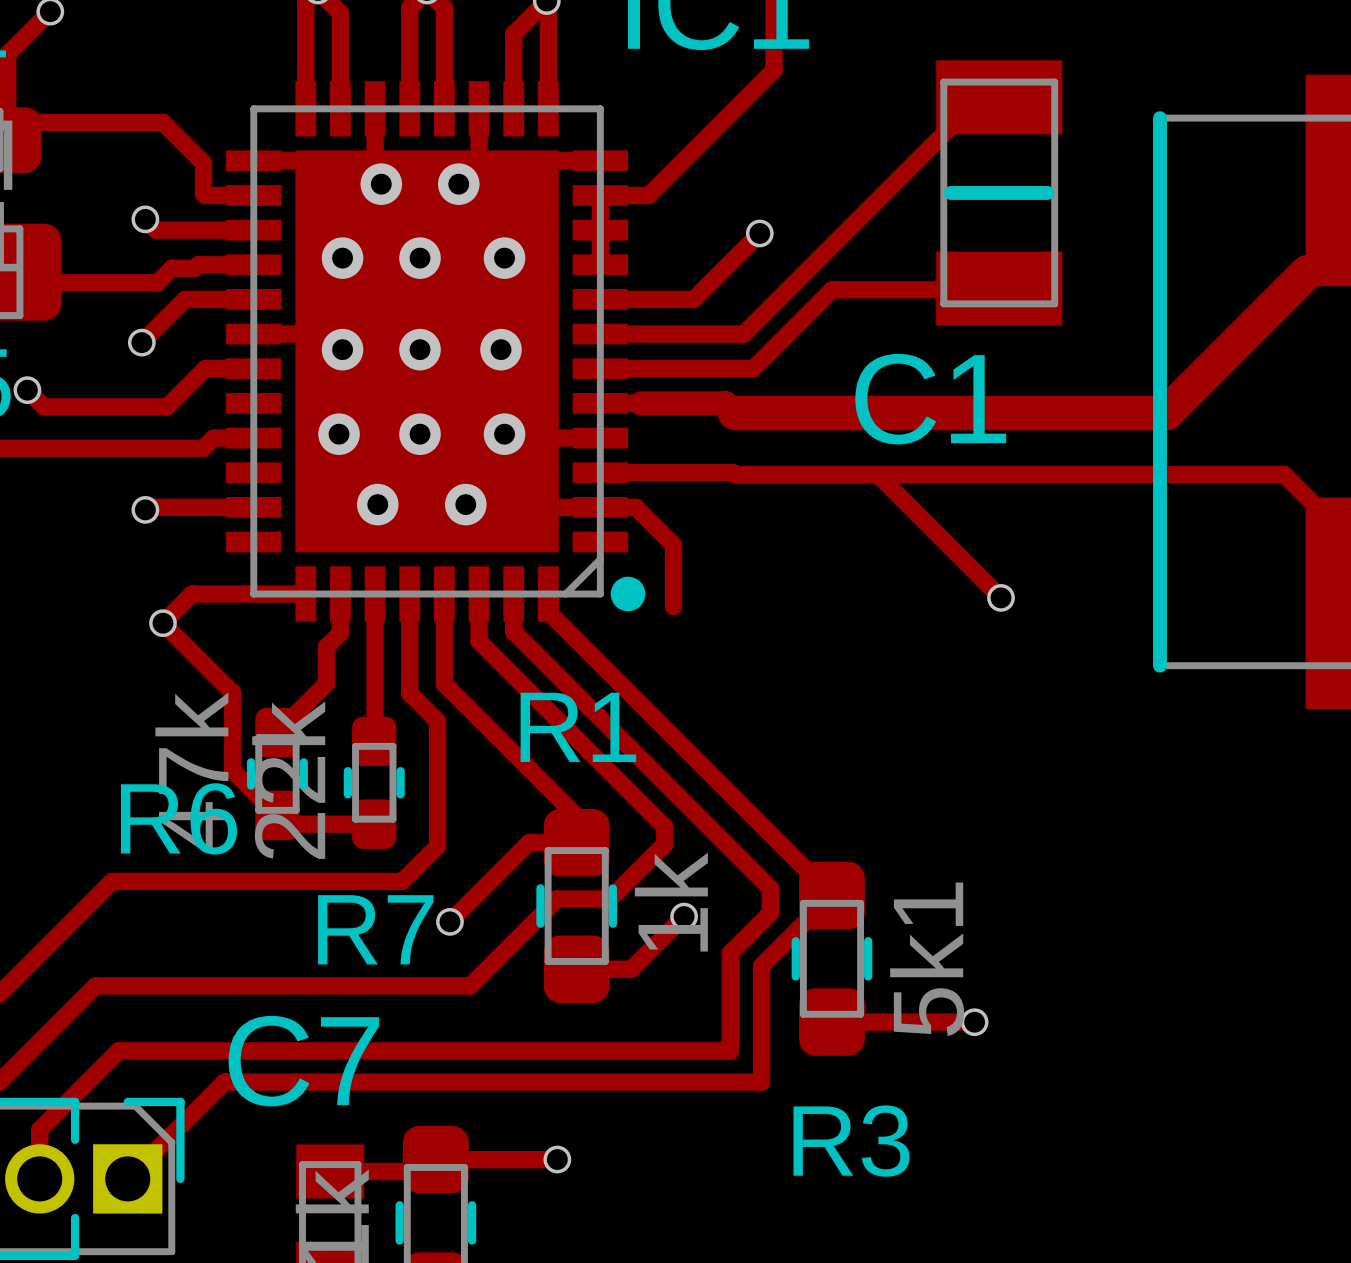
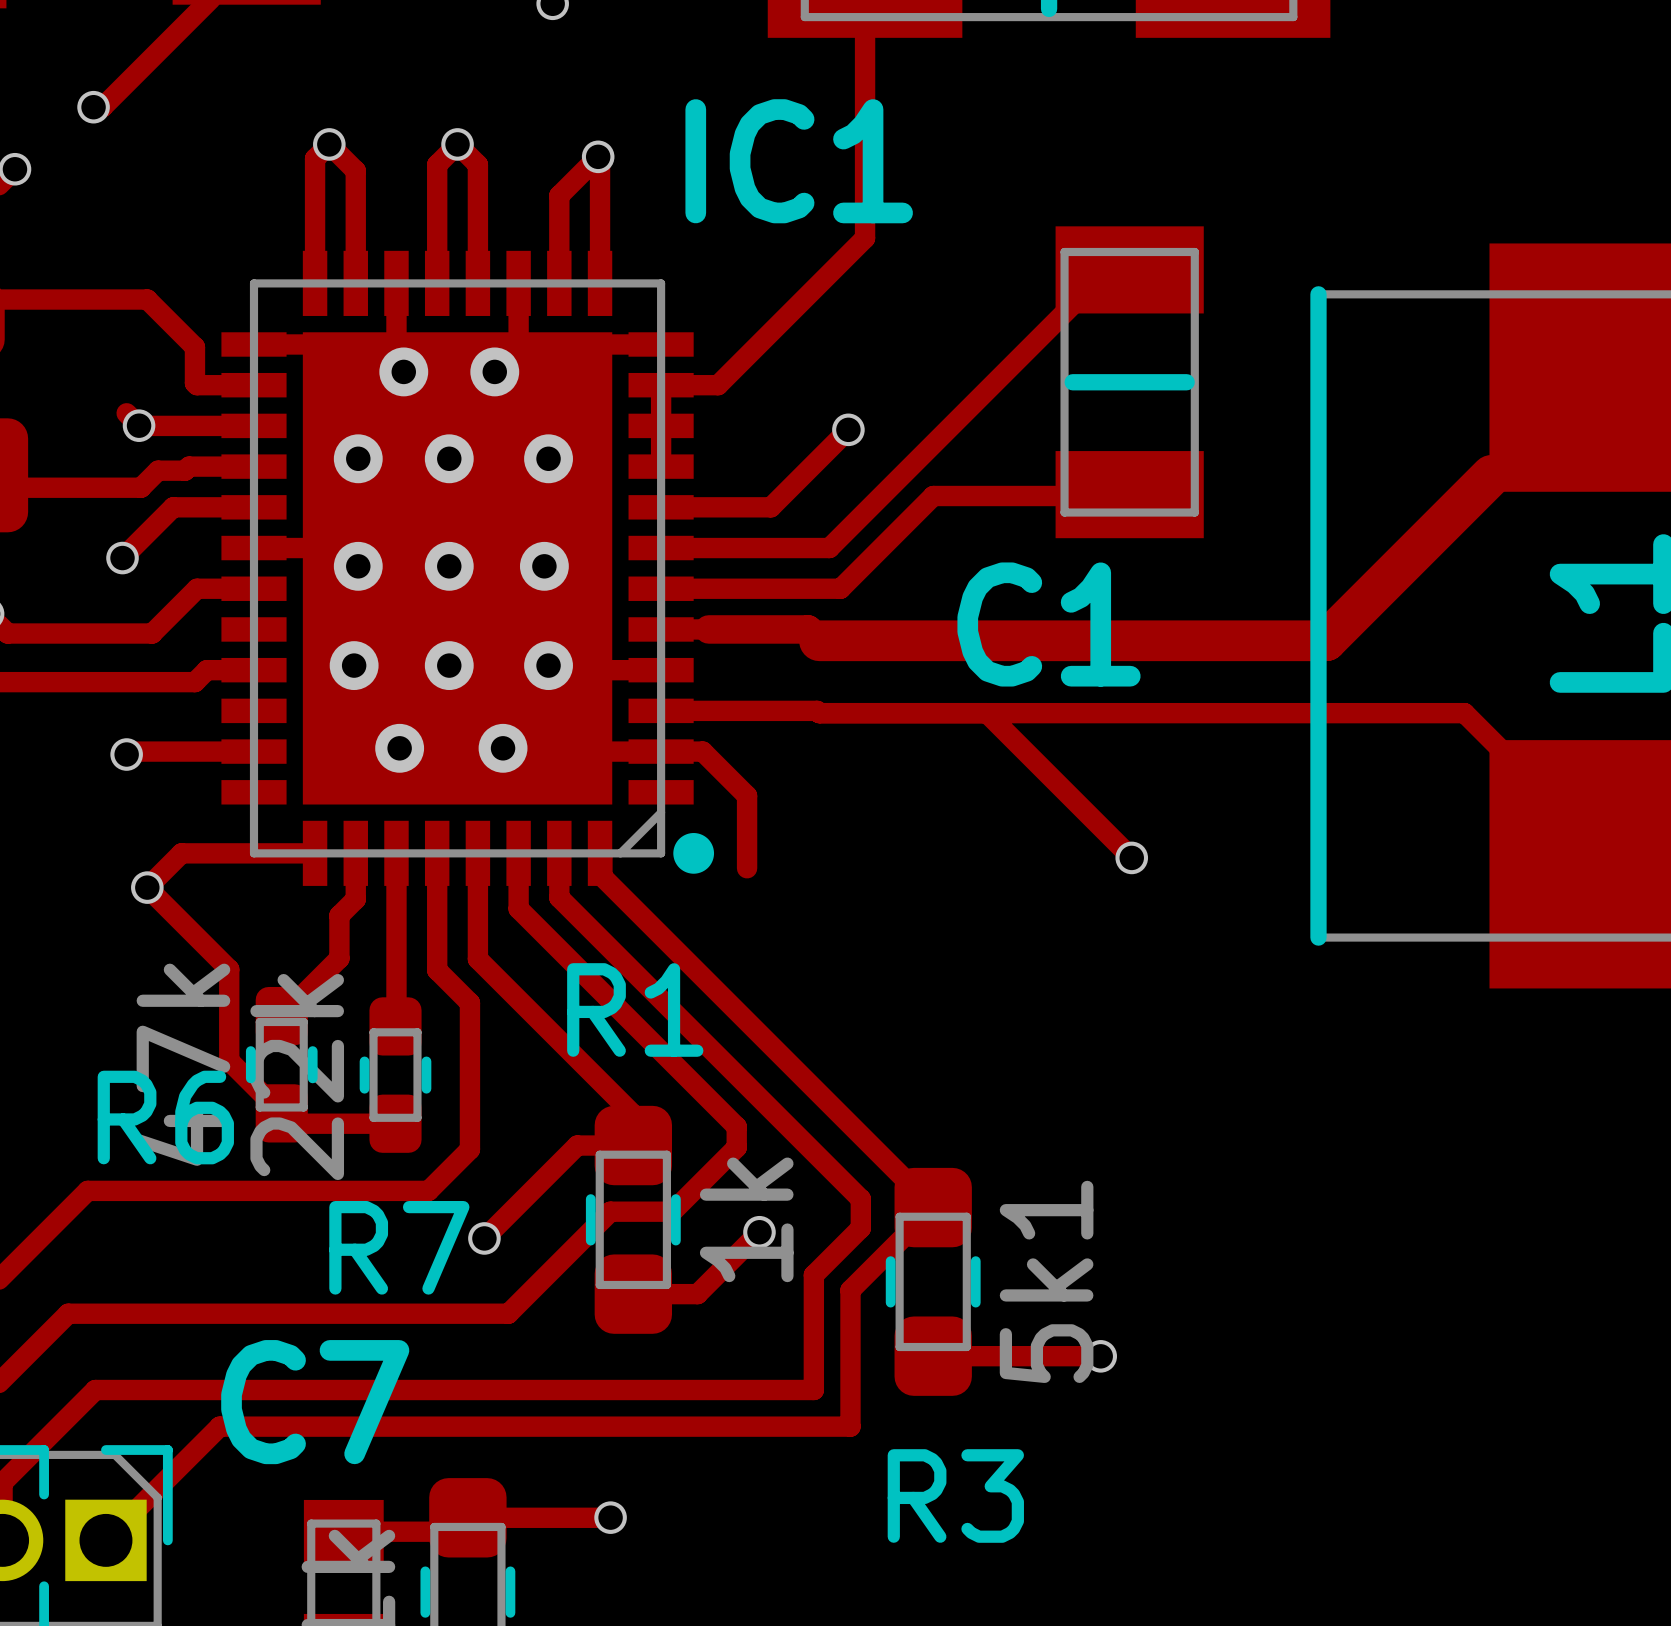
via position: (145, 219) -> (139, 425)

